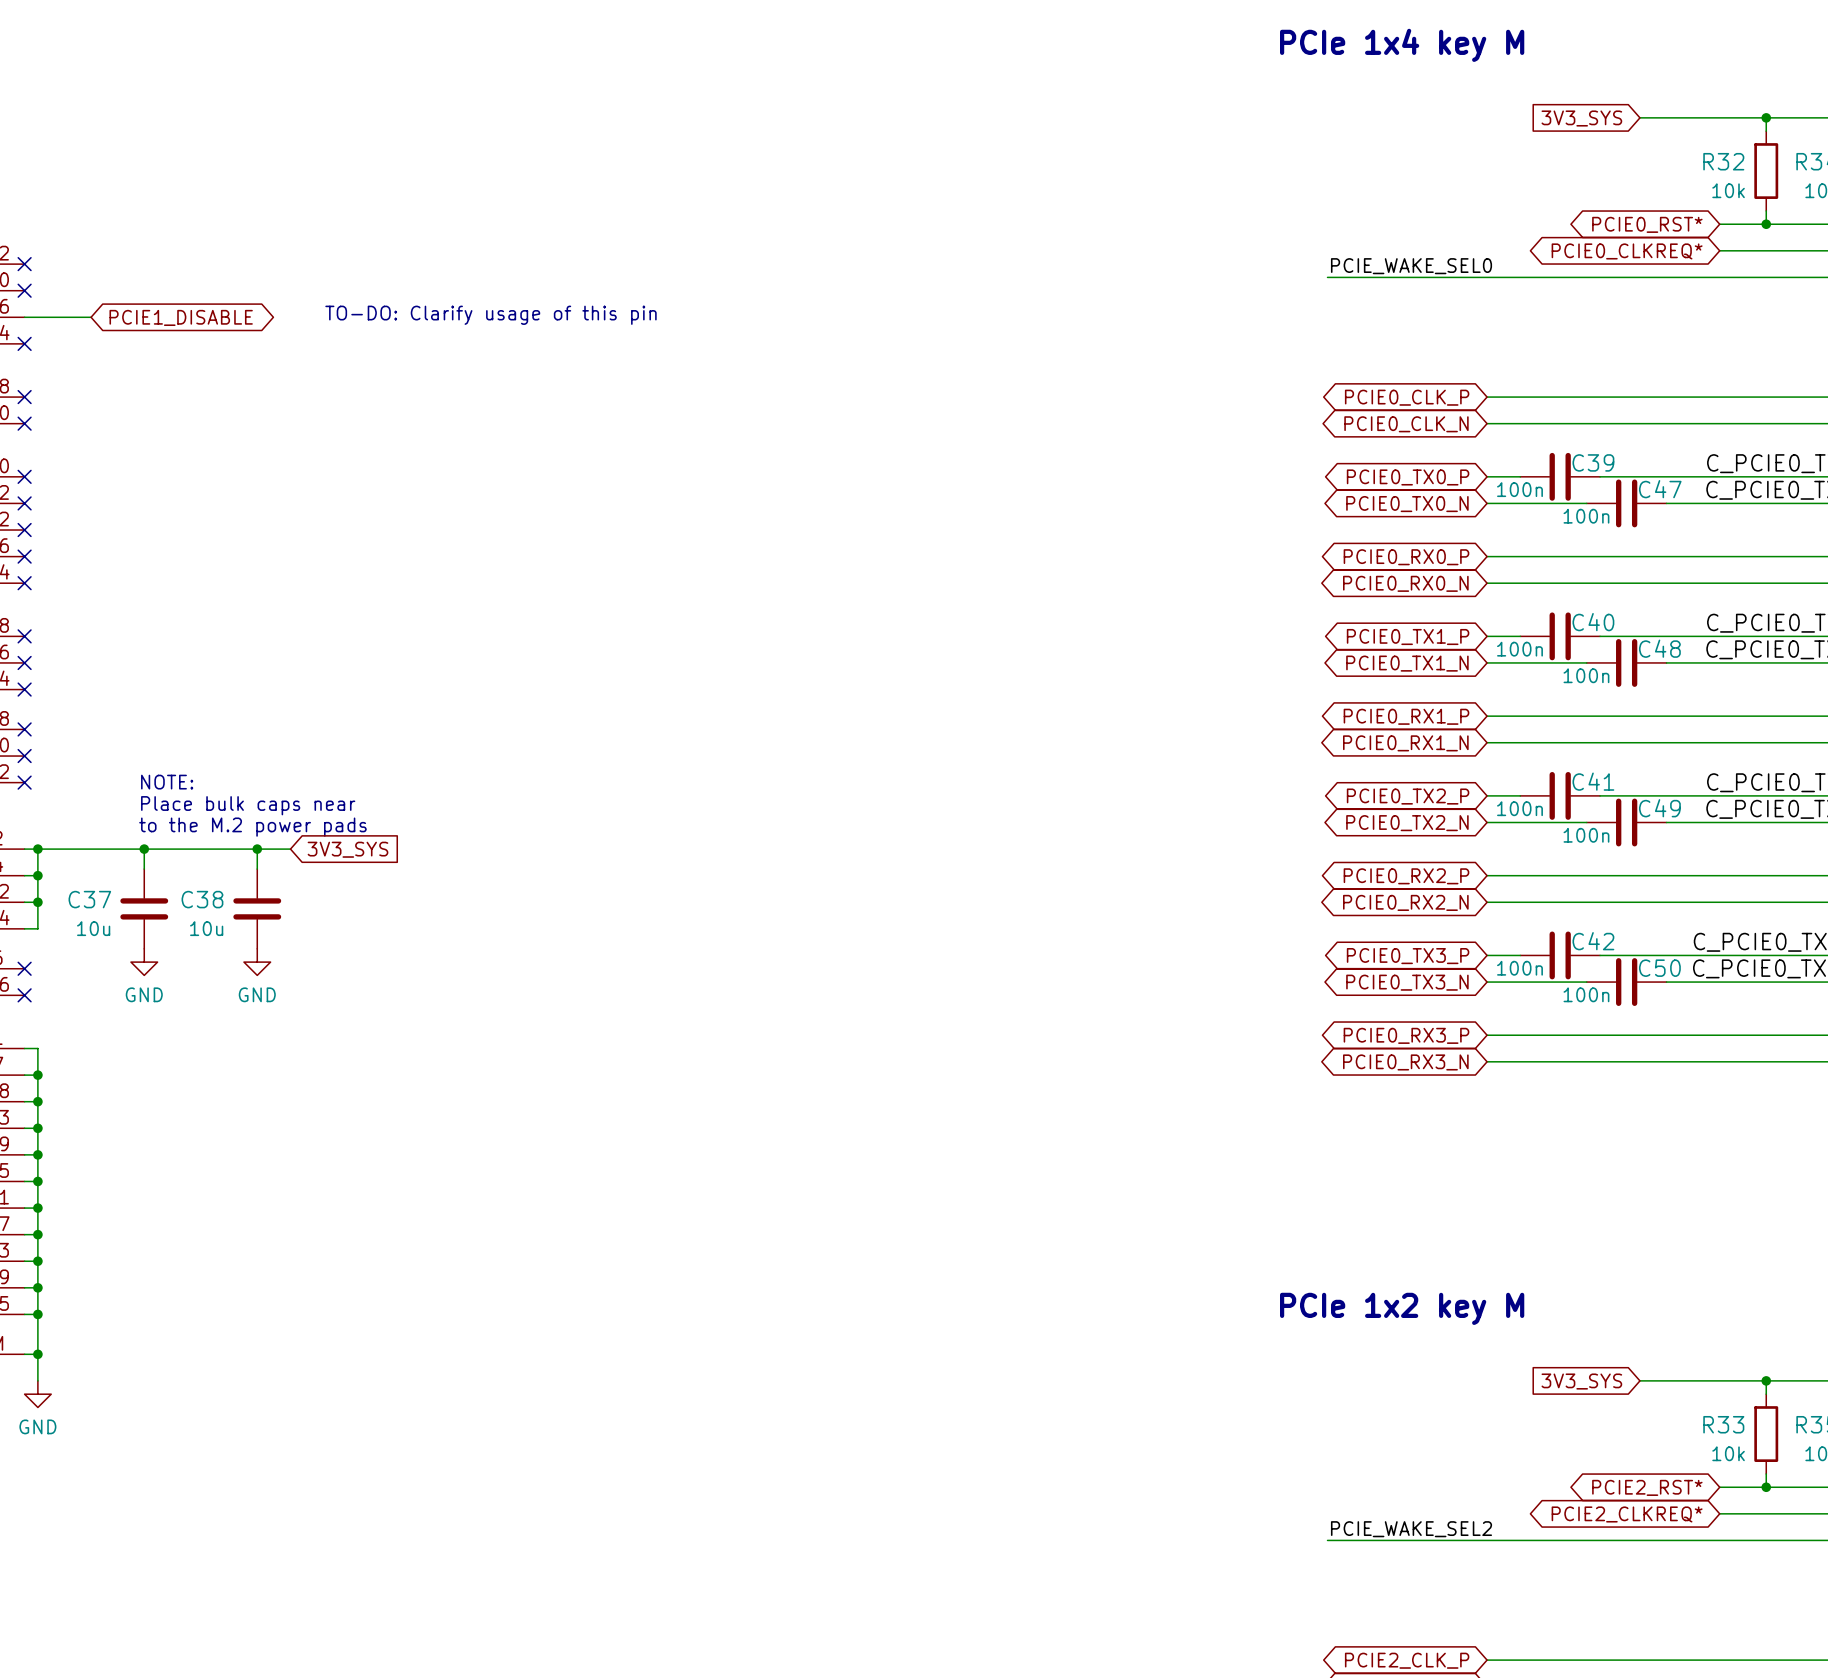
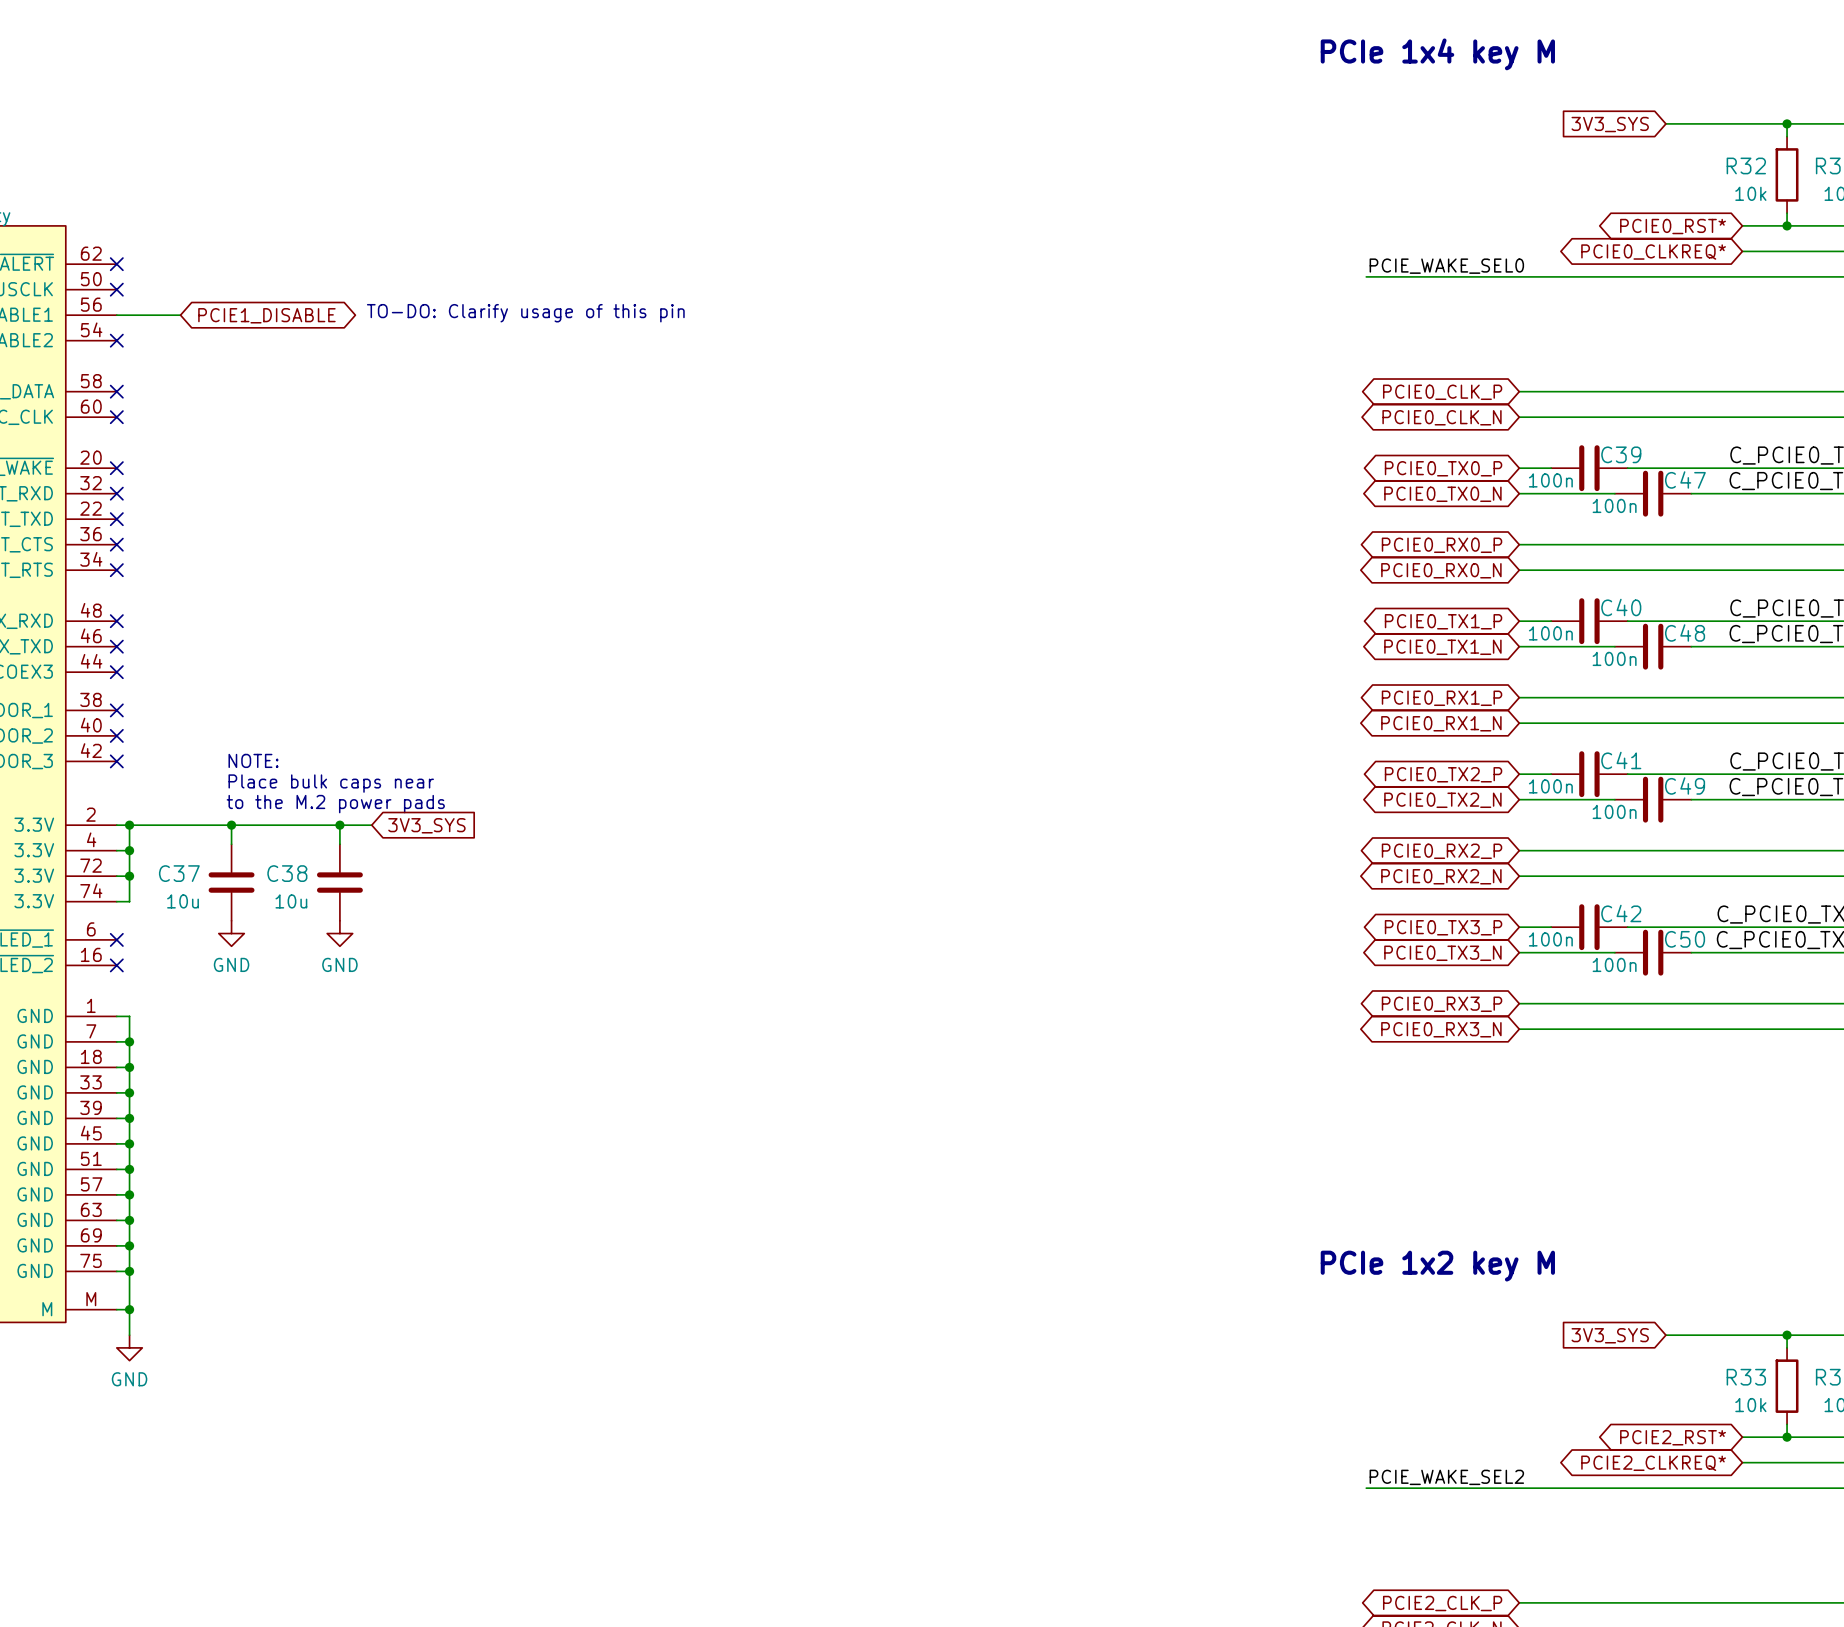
text position: TO-DO: Clarify usage of this pin (490, 315) -> TO-DO: Clarify usage of this pin (525, 313)

